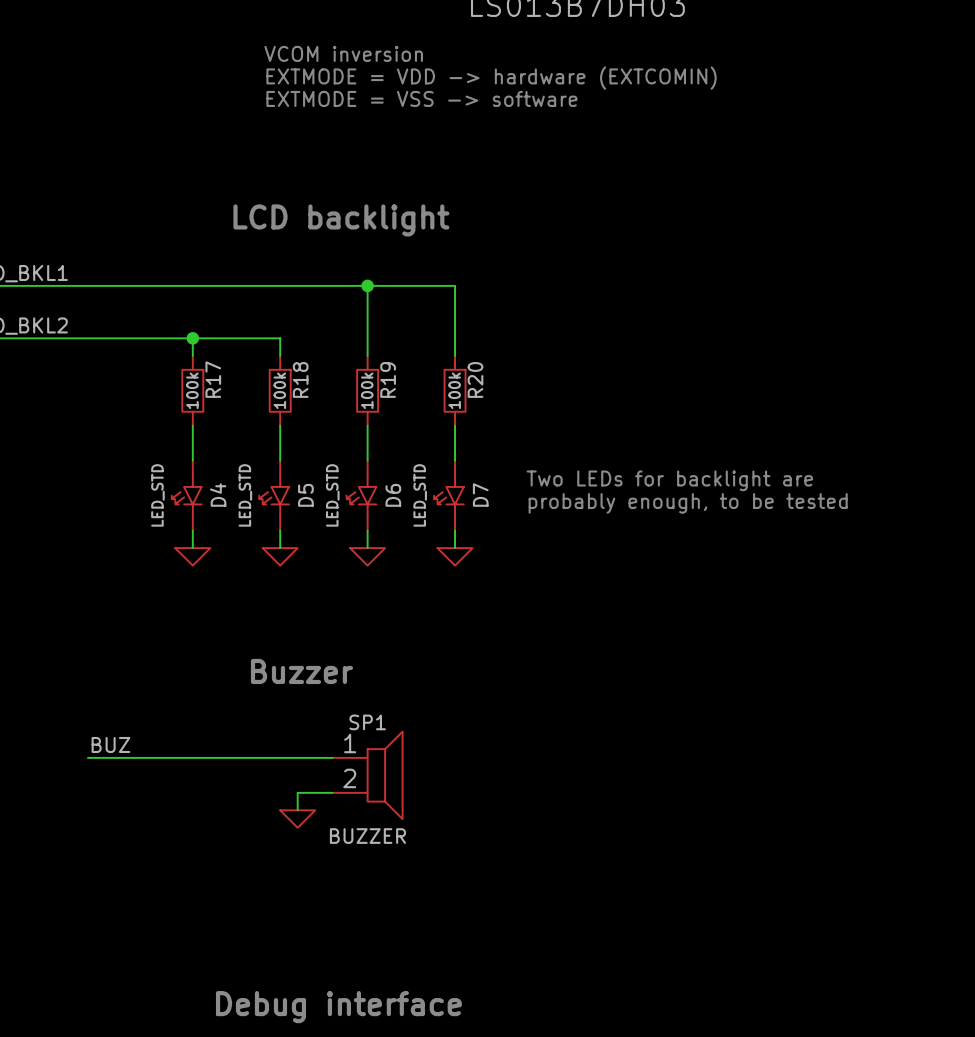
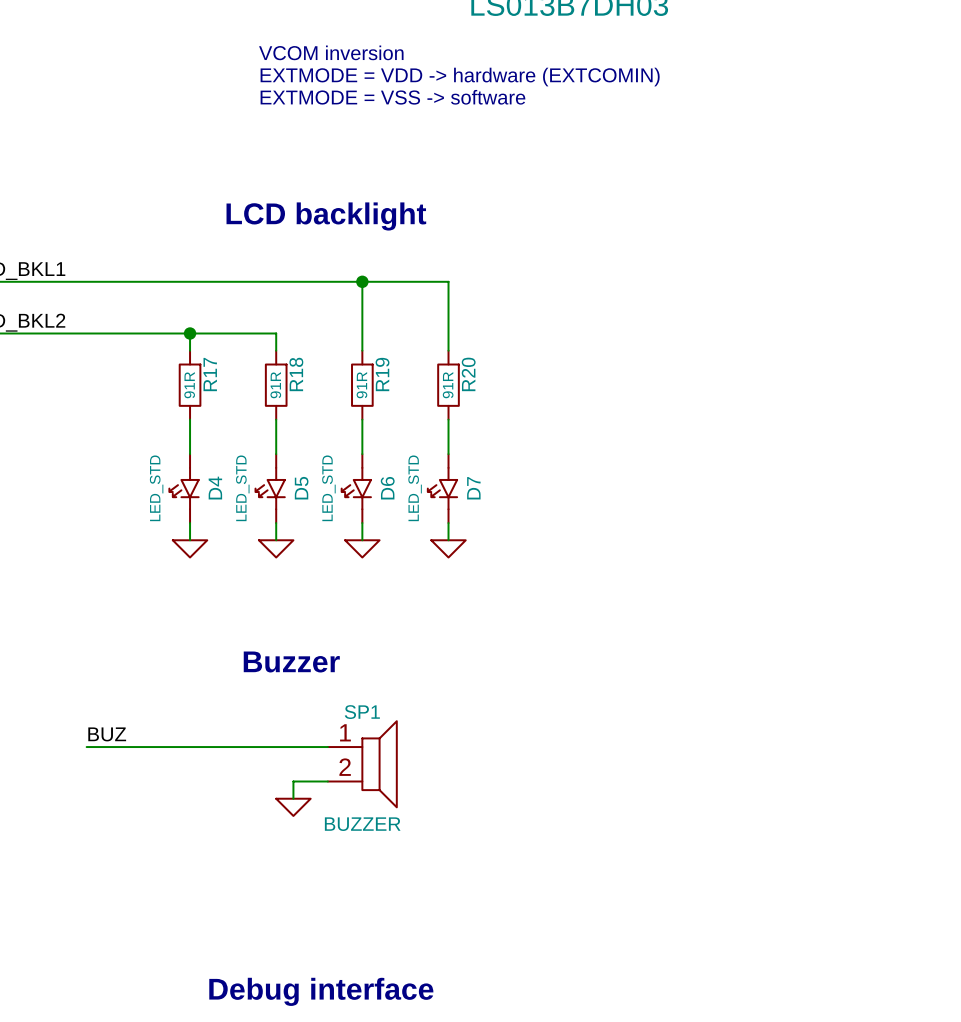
R17 value: 100k (192, 390) -> 91R (189, 385)
R18 value: 100k (279, 390) -> 91R (275, 385)
R19 value: 100k (367, 390) -> 91R (361, 385)
R20 value: 100k (454, 390) -> 91R (448, 385)
text: Two LEDs for backlight are (669, 480) -> none
text: probably enough, to be tested (688, 503) -> none

